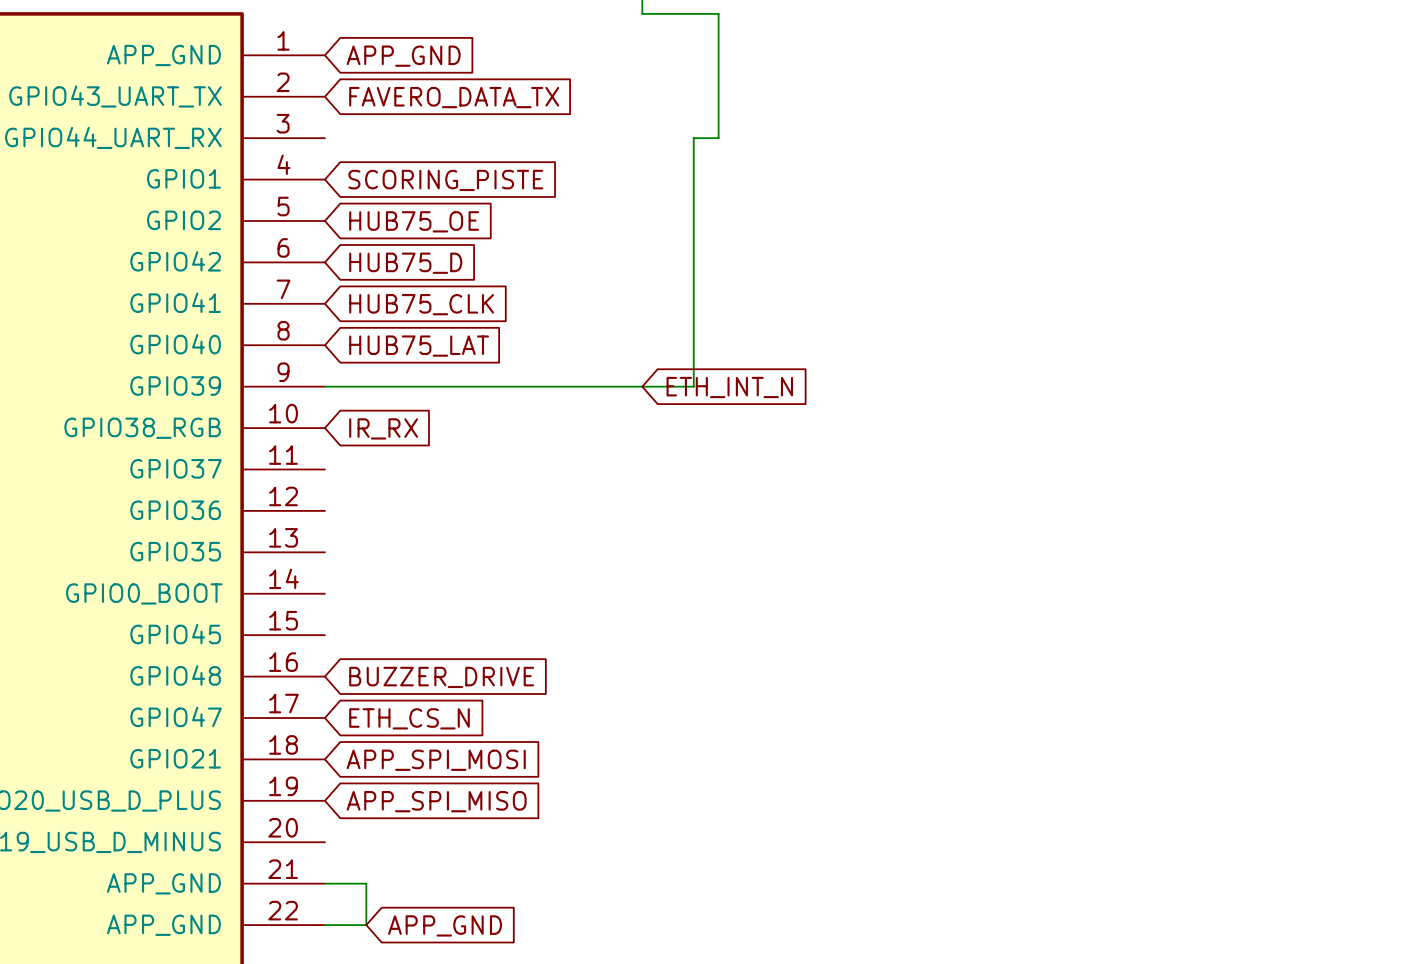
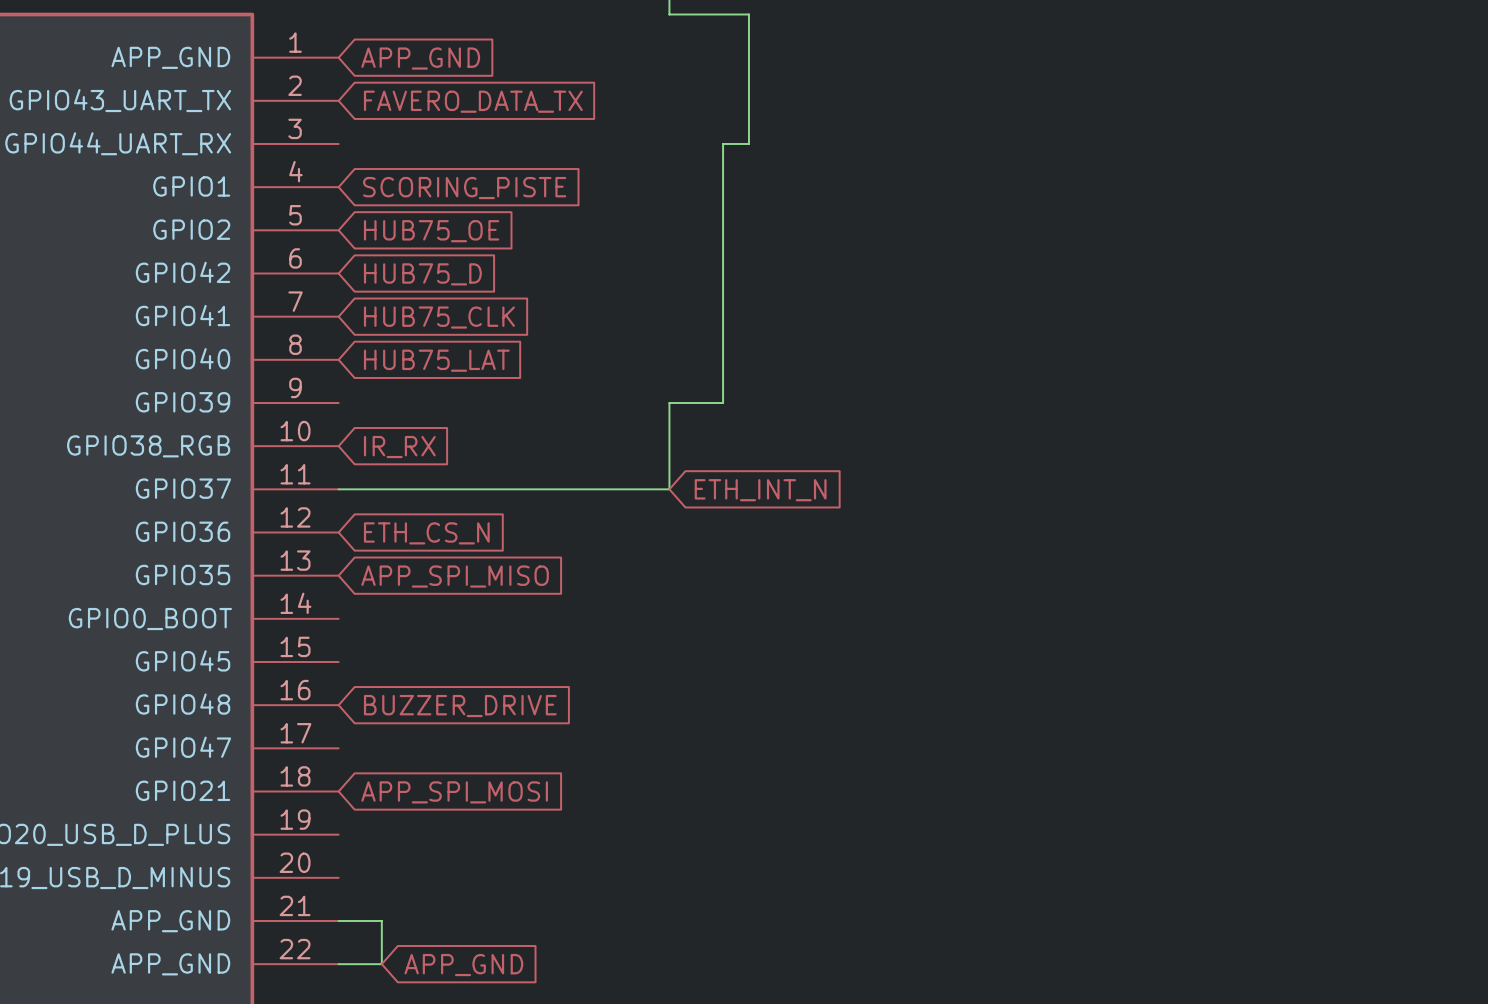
wire: (324, 386) (642, 386) -> (338, 489) (669, 489) (669, 402)
global label position: ETH_INT_N (729, 387) -> ETH_INT_N (760, 490)
global label position: ETH_CS_N (409, 718) -> ETH_CS_N (426, 533)
global label position: APP_SPI_MISO (436, 801) -> APP_SPI_MISO (455, 576)

